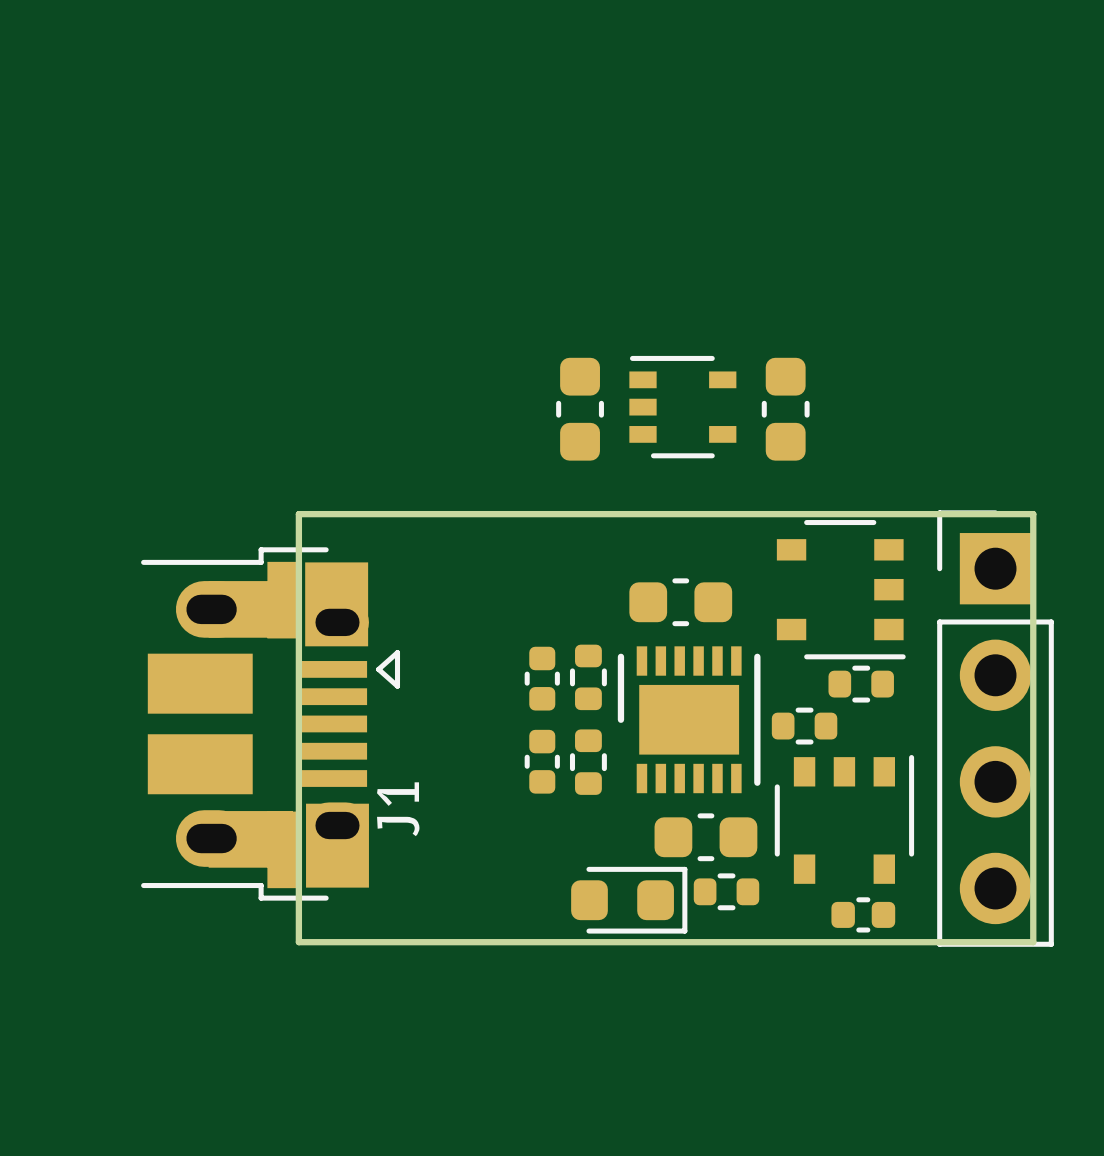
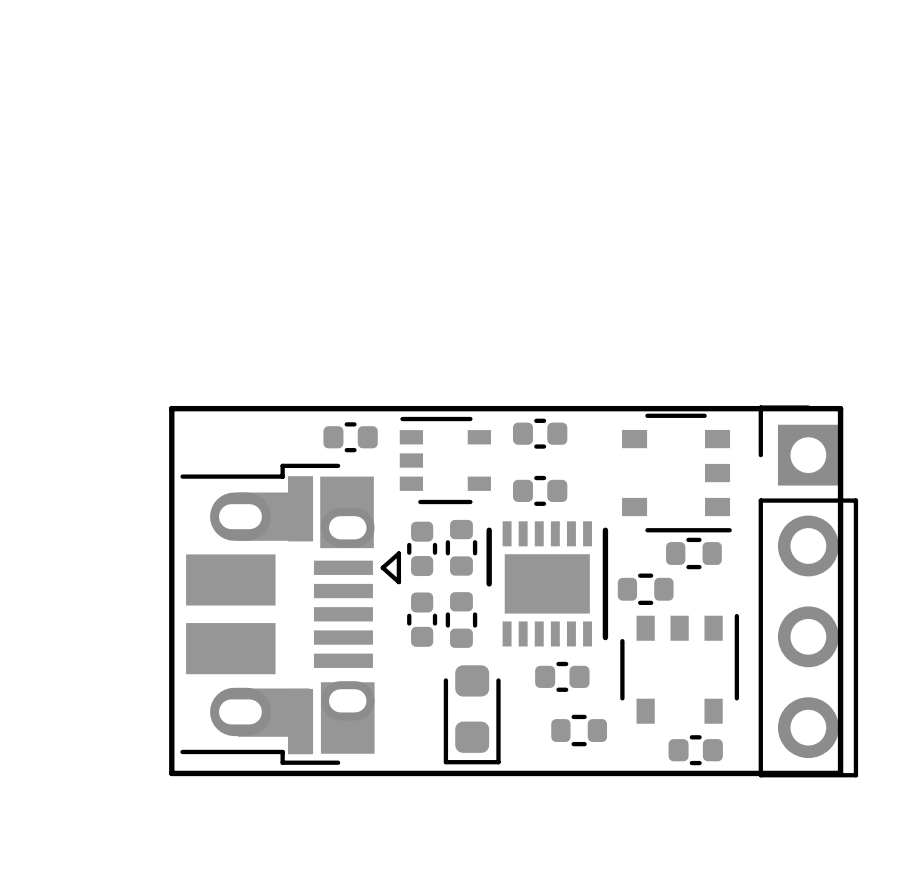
part position: (682, 407) -> (445, 460)
part: (580, 409) -> none
part: (785, 409) -> none
board edge: (298, 514) (298, 942) -> (214, 408) (171, 408) (171, 773) (214, 773)
part: none -> (540, 433)
part: none -> (350, 437)
part footprint: [629, 578, 733, 627] -> [512, 475, 568, 506]
J1: (270, 723) -> none
part: none -> (290, 614)
part footprint: [654, 813, 758, 862] -> [535, 661, 590, 692]
part rotation: 0° (629, 900) -> 90° clockwise (472, 714)

